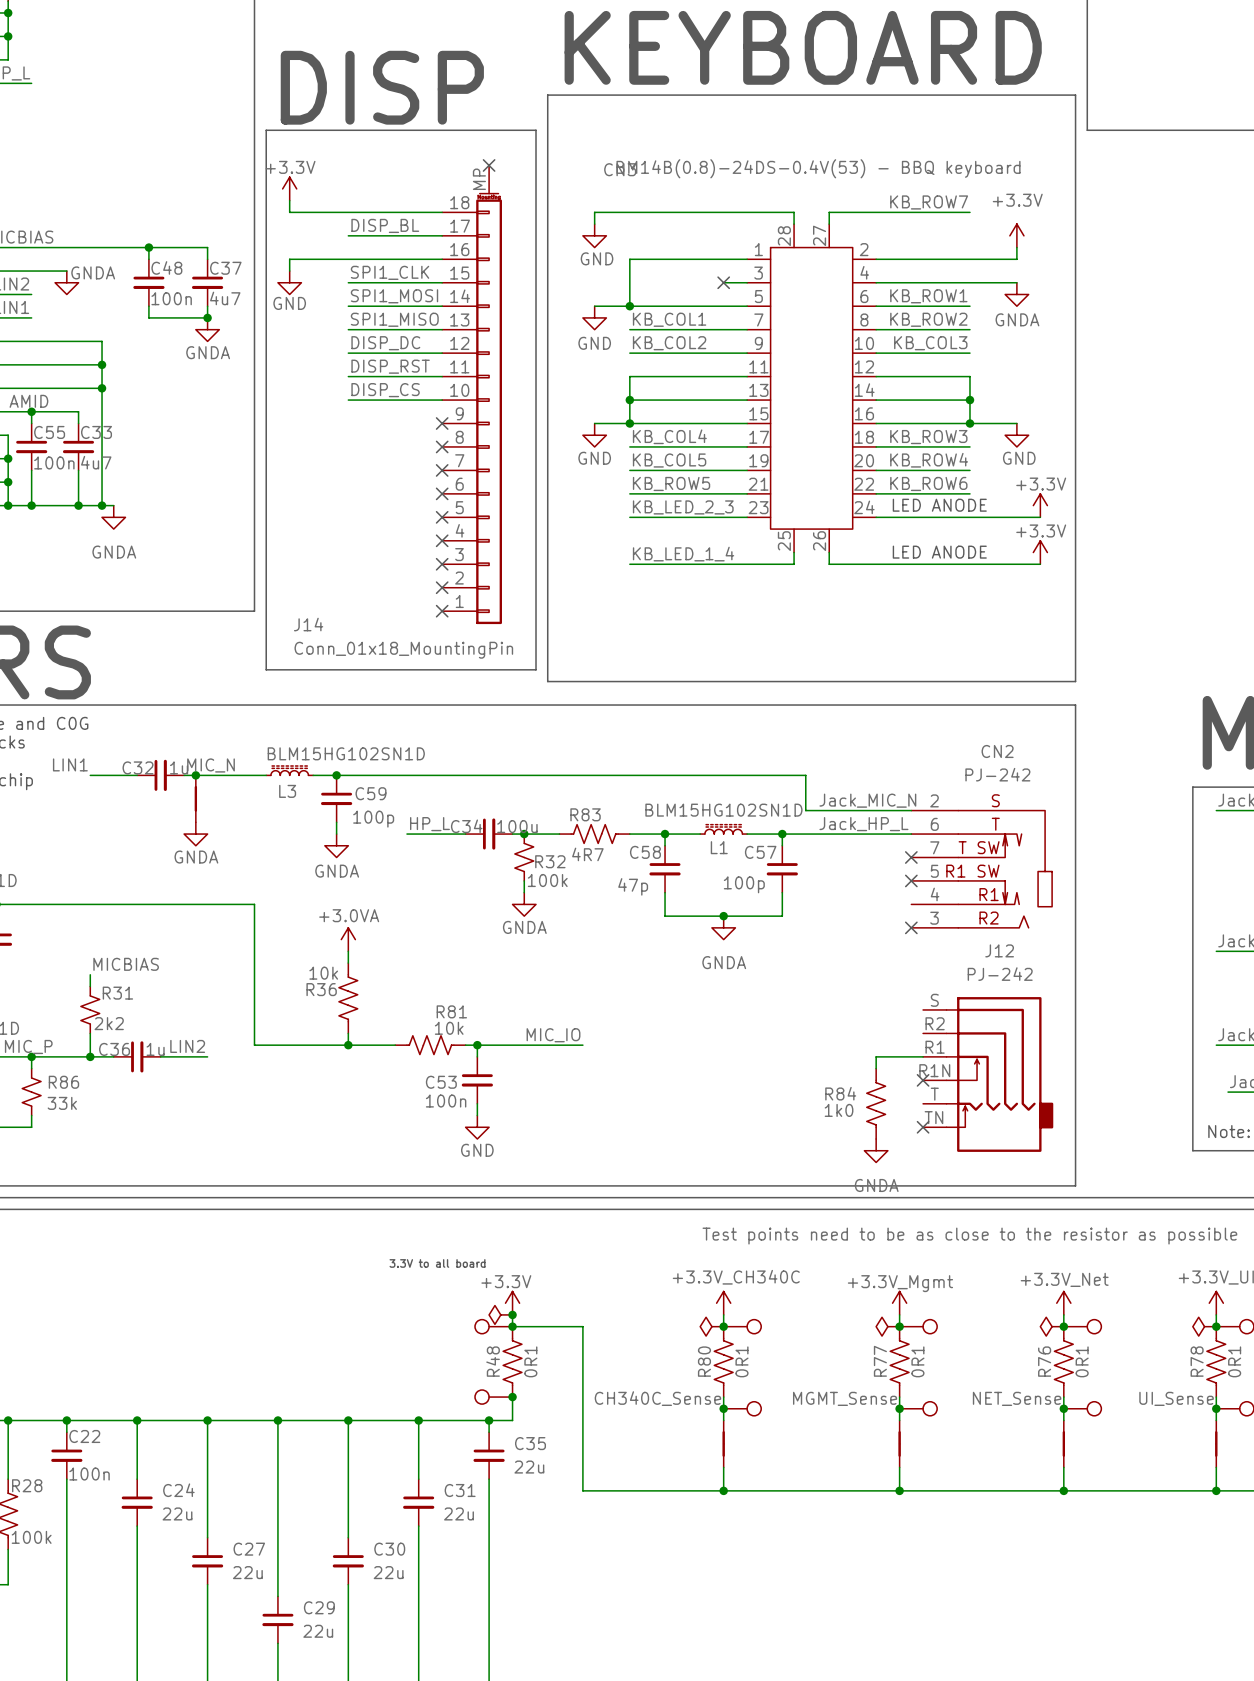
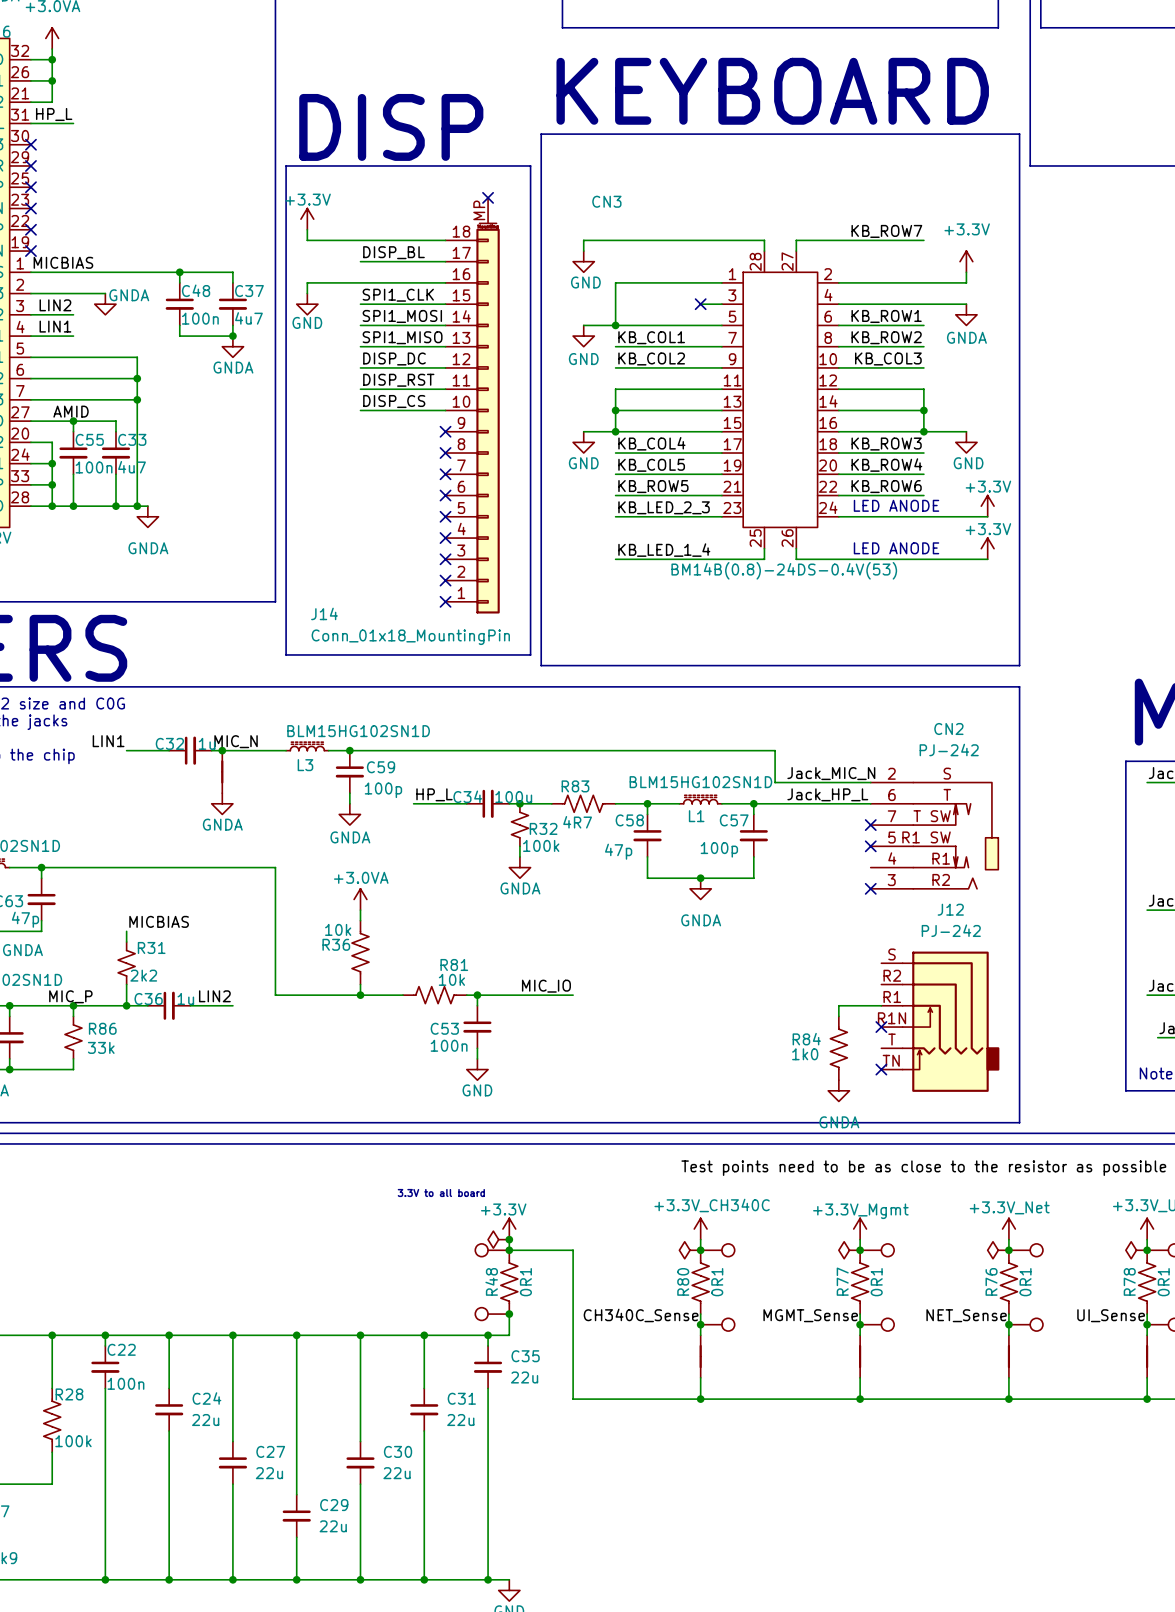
CN3 value: BM14B(0.8)-24DS-0.4V(53) - BBQ keyboard (818, 168) -> BM14B(0.8)-24DS-0.4V(53) (784, 570)

